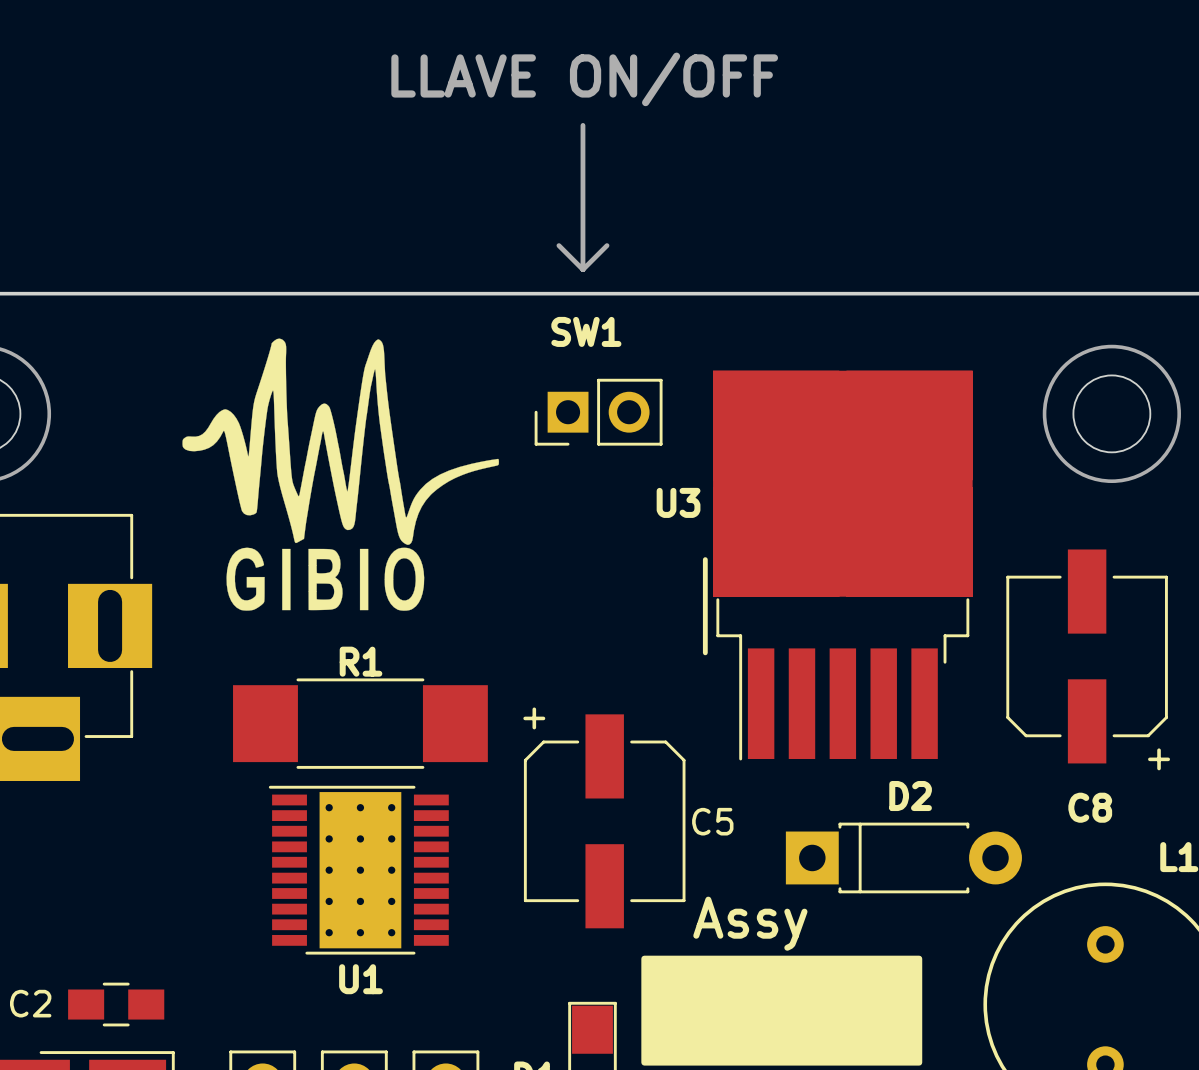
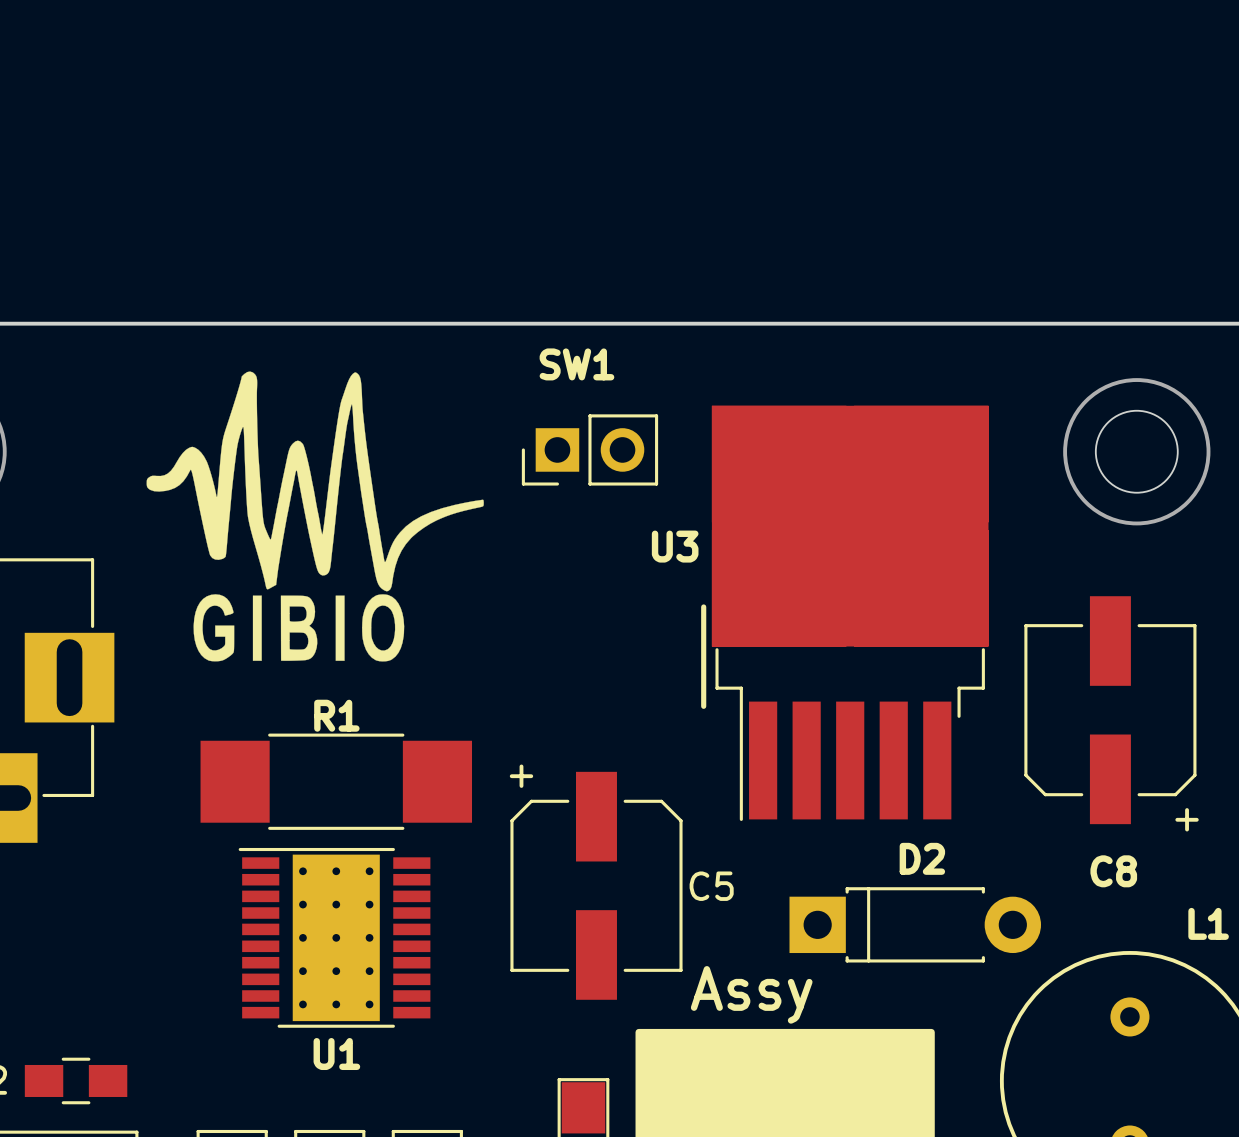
text: LLAVE ON/OFF (584, 79) -> none
line: (582, 125) (582, 269) -> none
line: (558, 245) (582, 269) -> none
line: (607, 245) (582, 269) -> none

